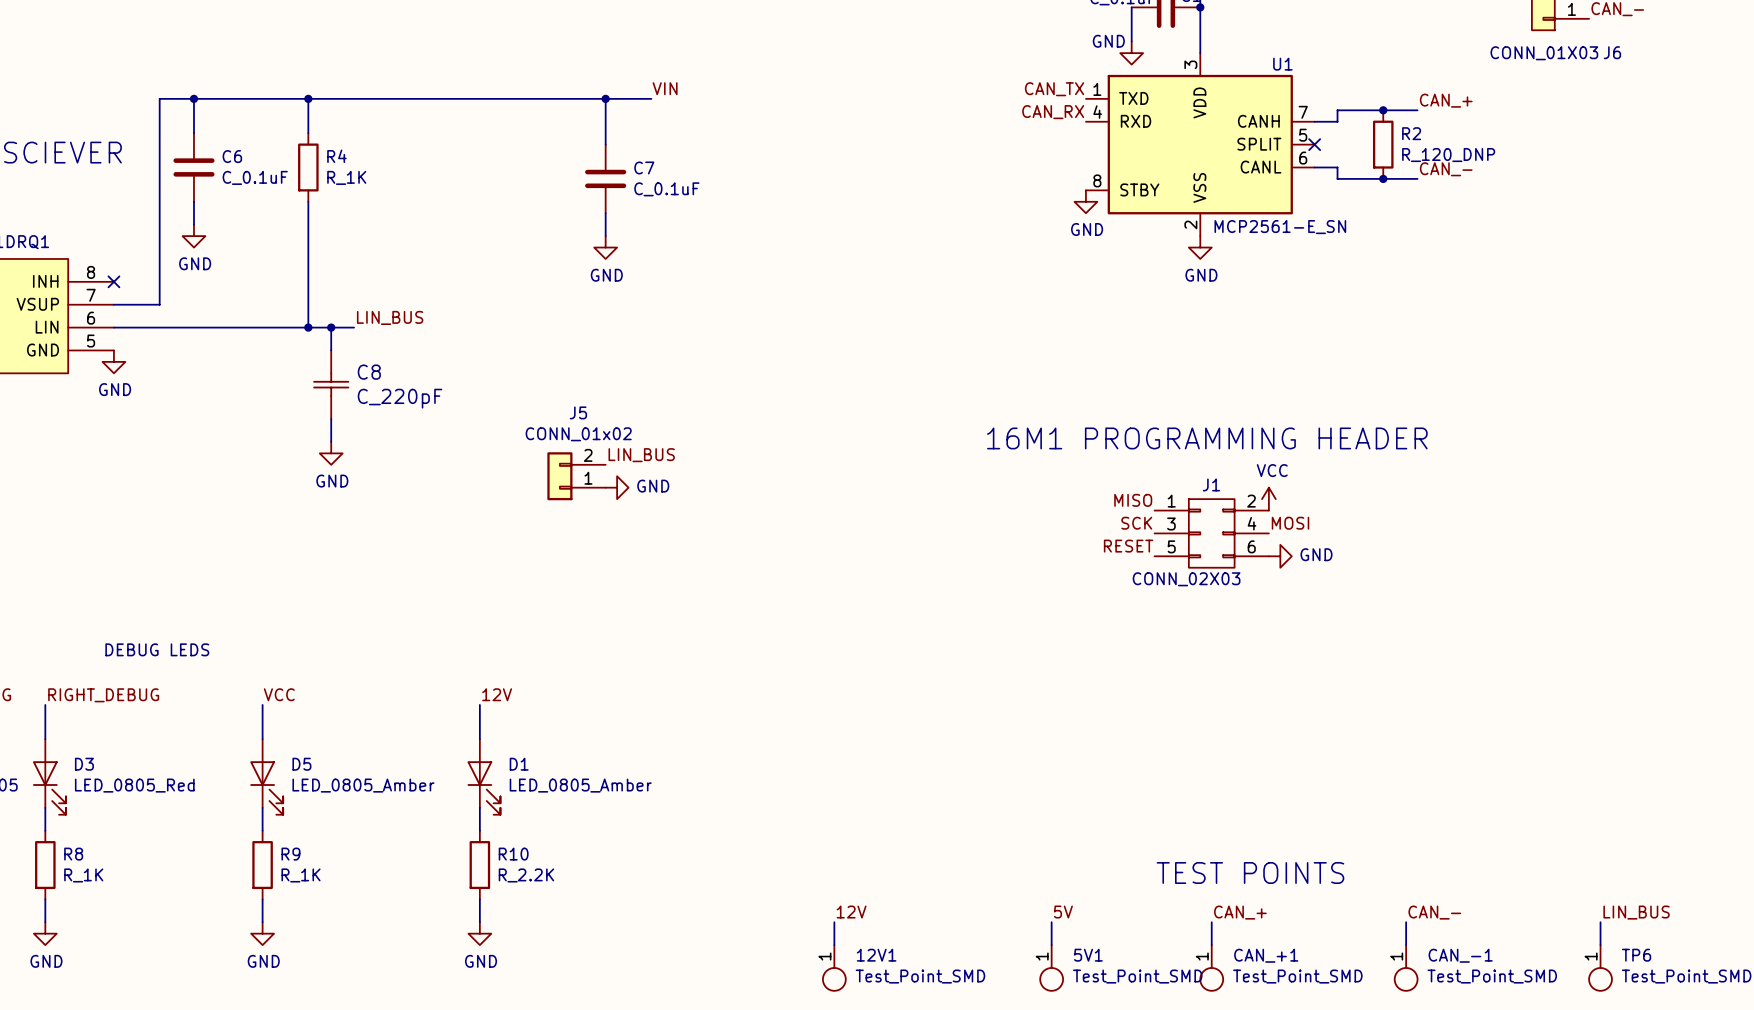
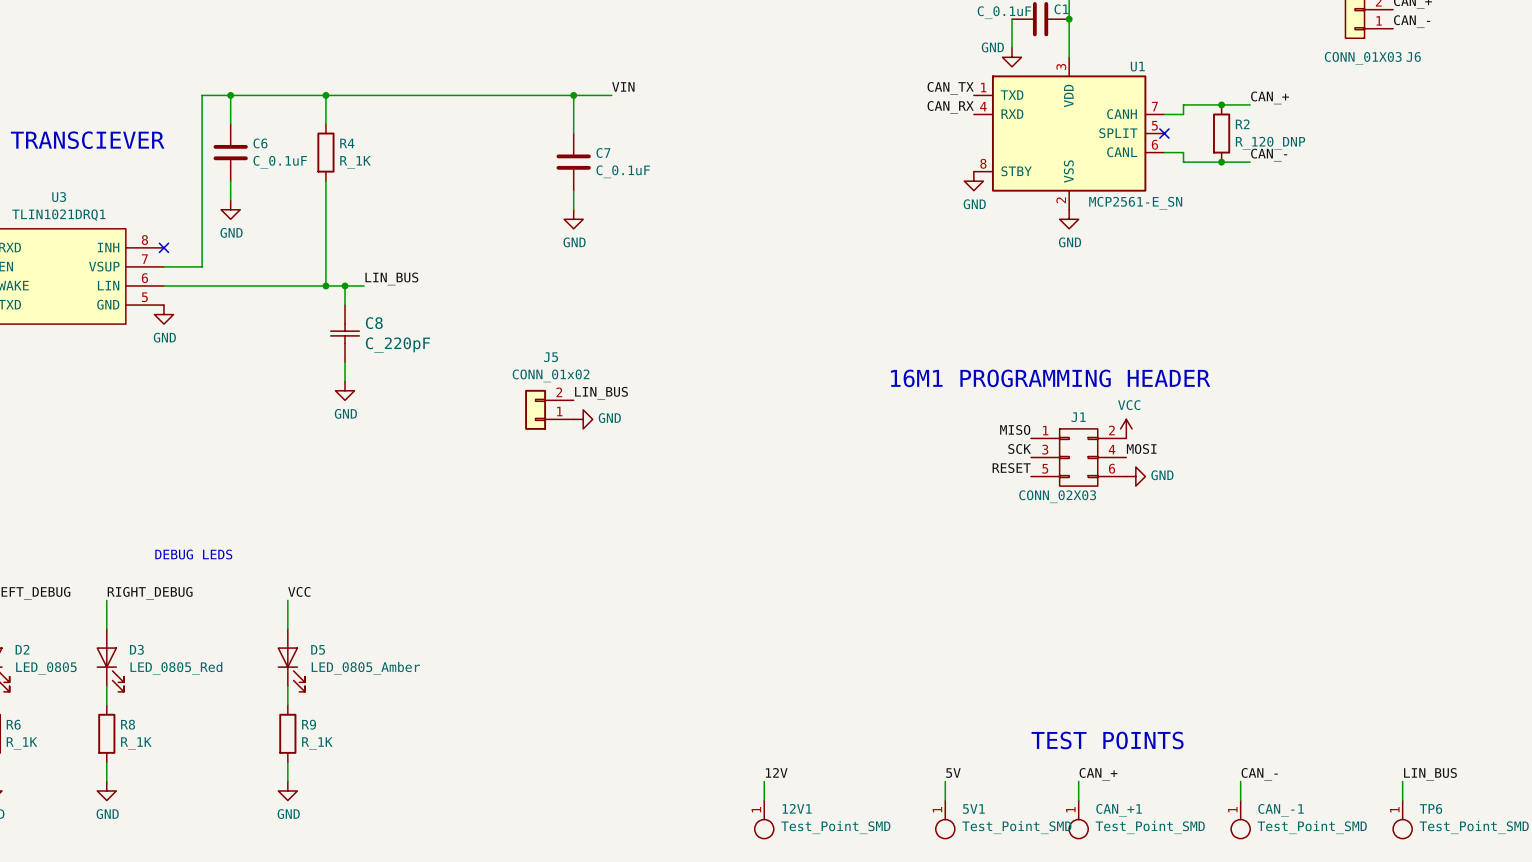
label: 12V (497, 694) -> none
wire: (479, 704) (479, 739) -> none
D1: LED_0805_Amber (483, 776) -> none
wire: (479, 807) (479, 830) -> none
R10: R_2.2K (479, 865) -> none
wire: (479, 899) (479, 922) -> none
power symbol: GND (479, 933) -> none

